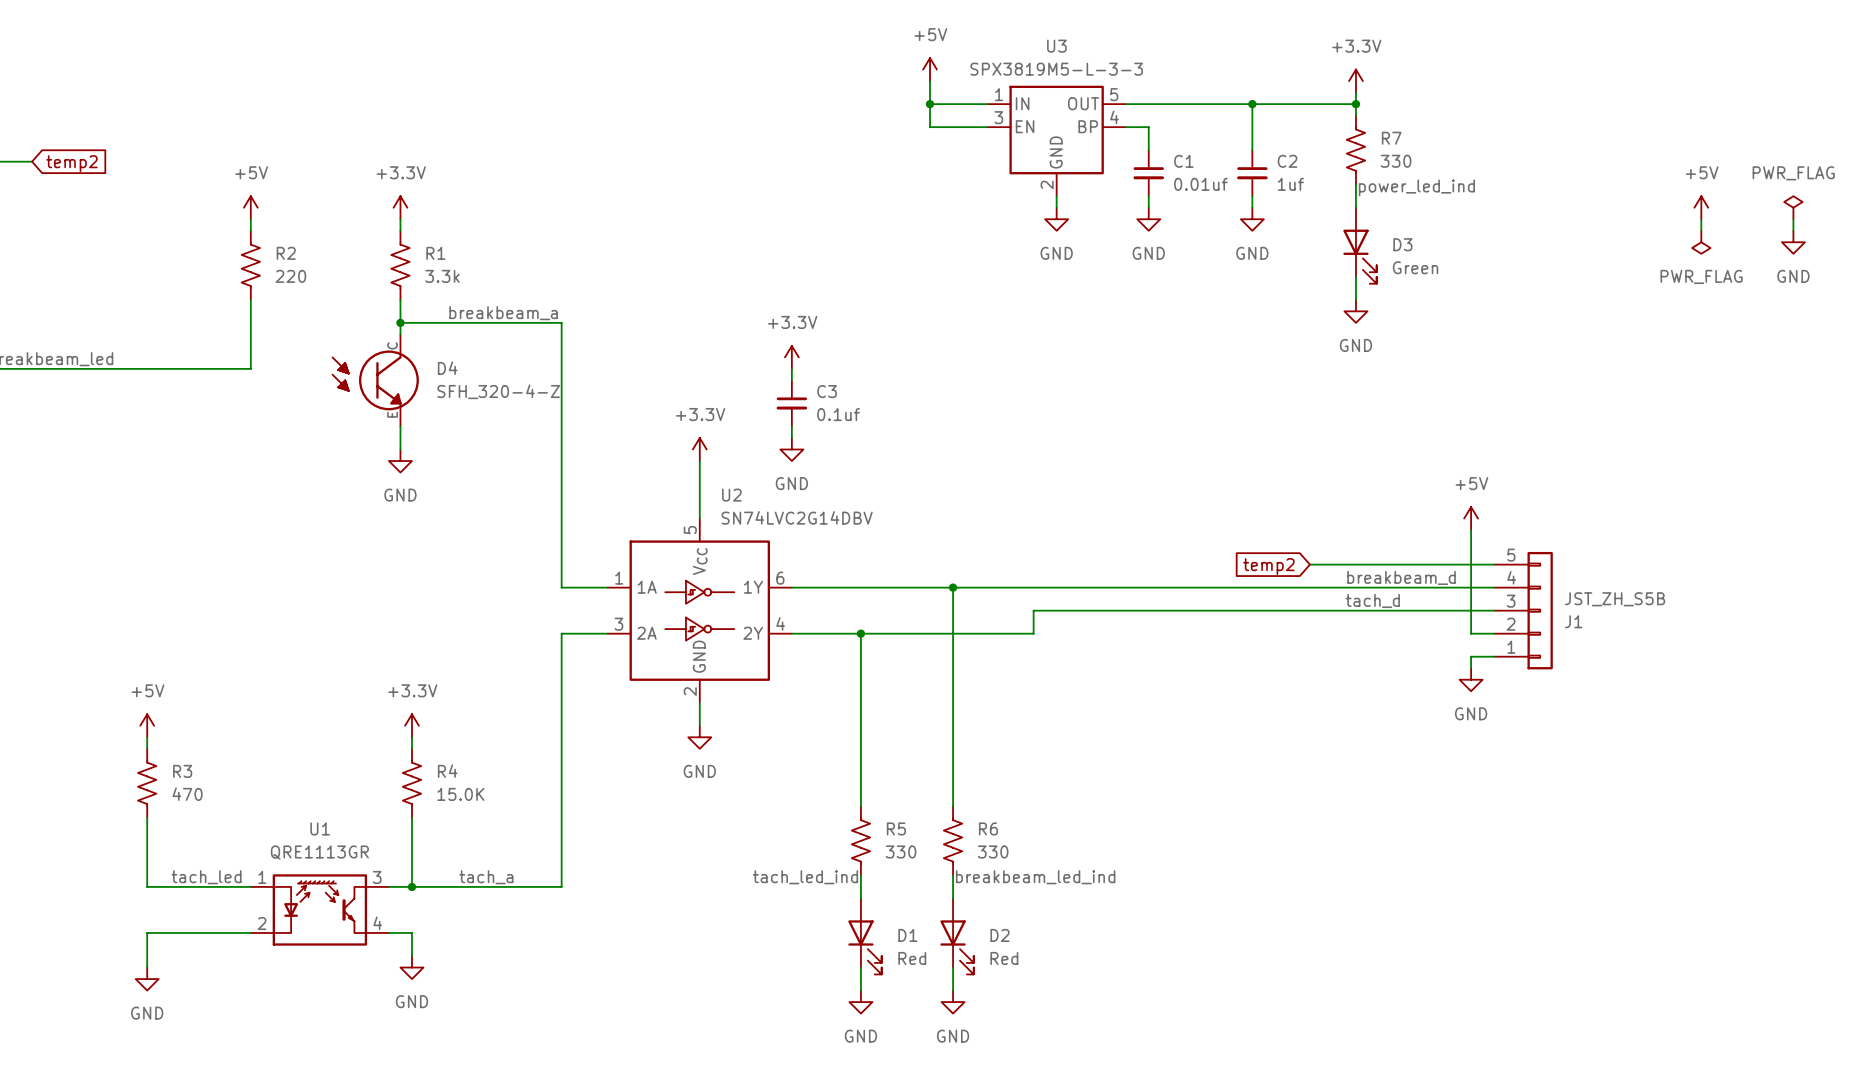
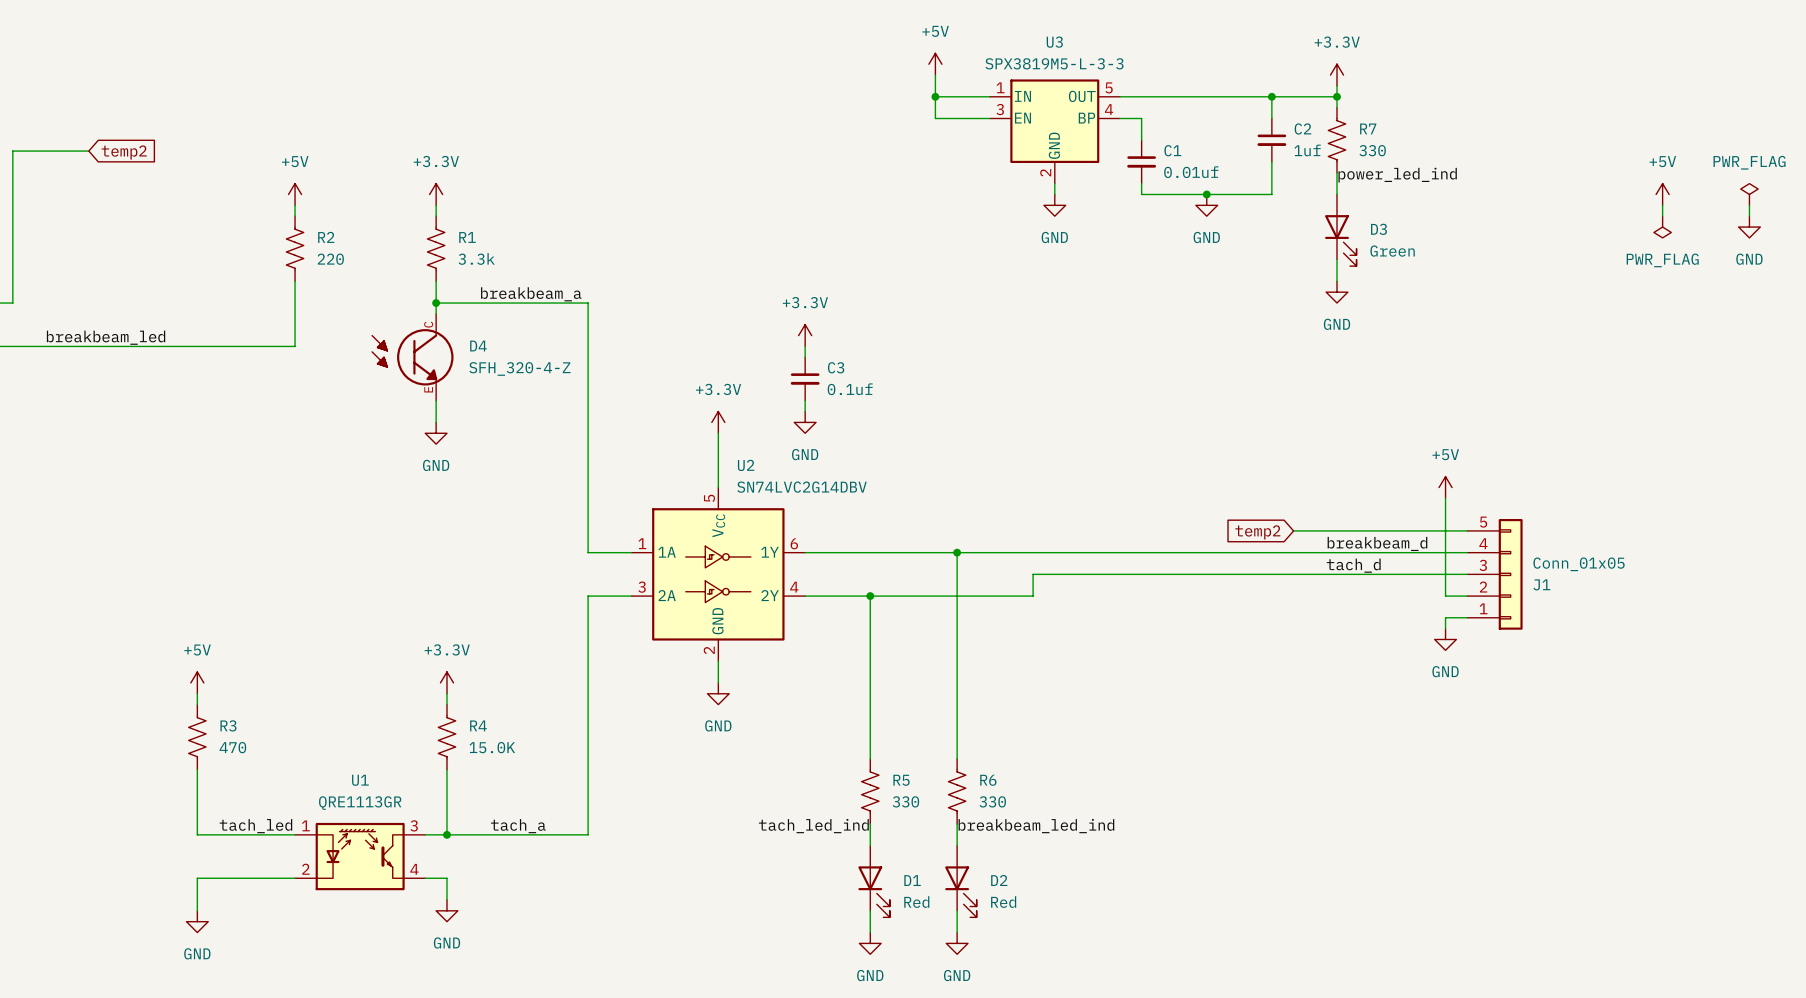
wire: (1252, 104) (1252, 150) -> none
junction position: (1252, 104) -> (1271, 96)
wire: none -> (1271, 96) (1271, 118)
C2 position: (1252, 173) -> (1271, 140)
wire: none -> (1271, 161) (1271, 194) (1141, 194)
wire: (1252, 196) (1252, 207) -> none
junction: none -> (1206, 194)
power symbol: GND (1148, 219) -> none
power symbol: none -> GND (1206, 205)
power symbol: GND (1252, 219) -> none
J1 value: JST_ZH_S5B (1615, 599) -> Conn_01x05 (1579, 564)

